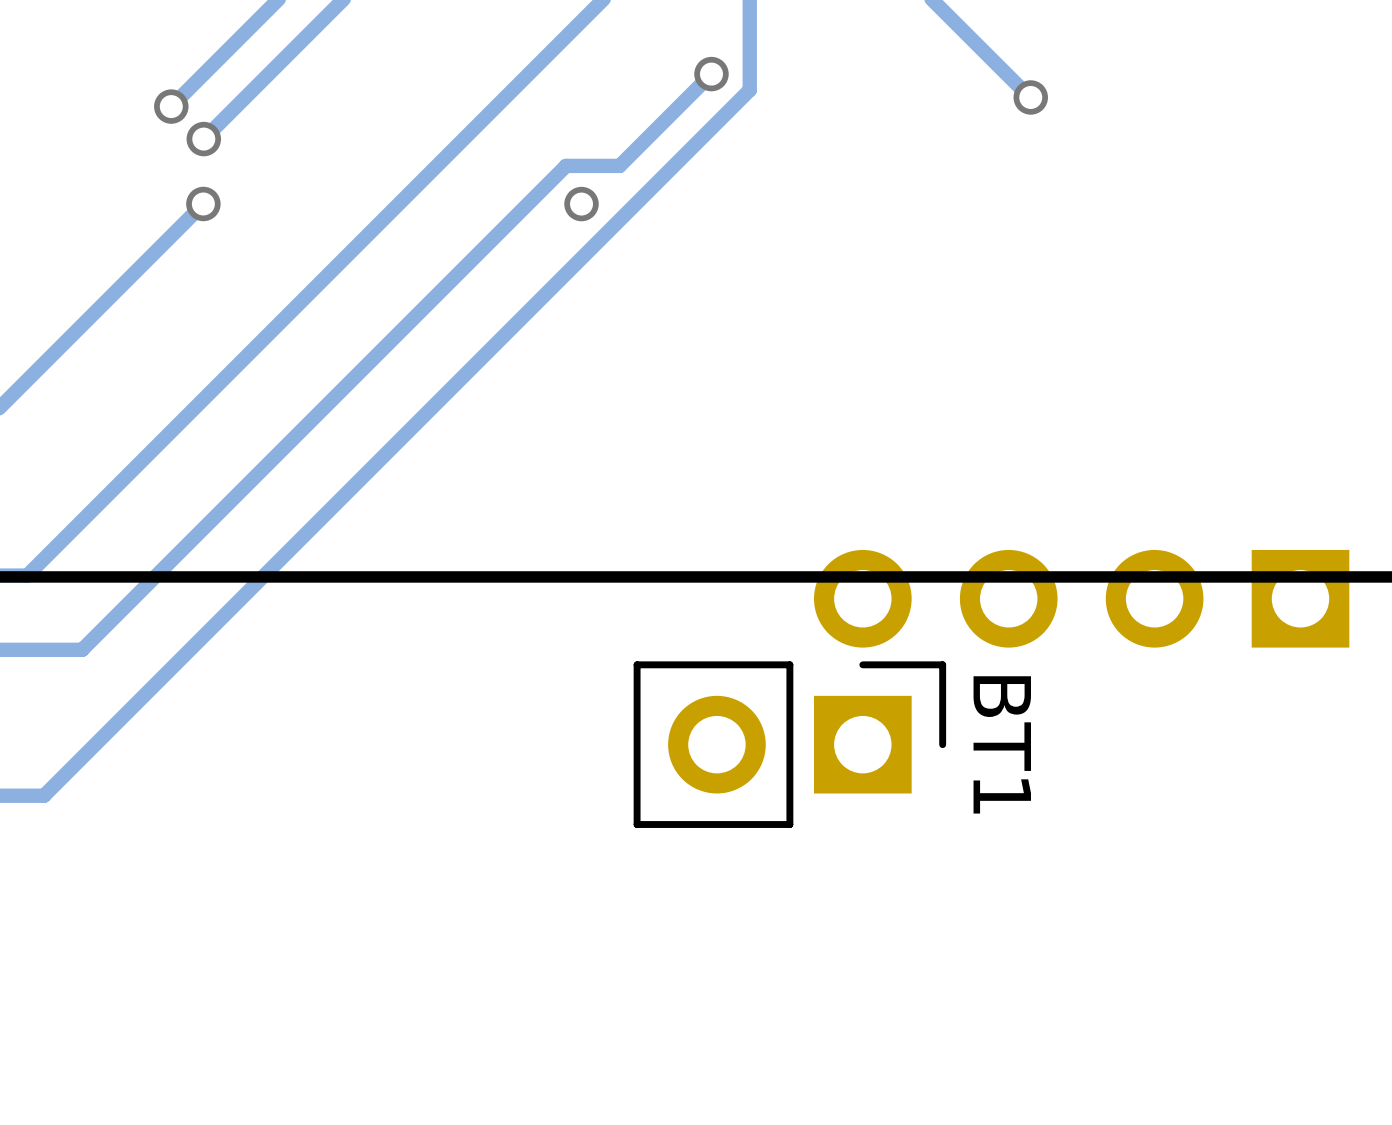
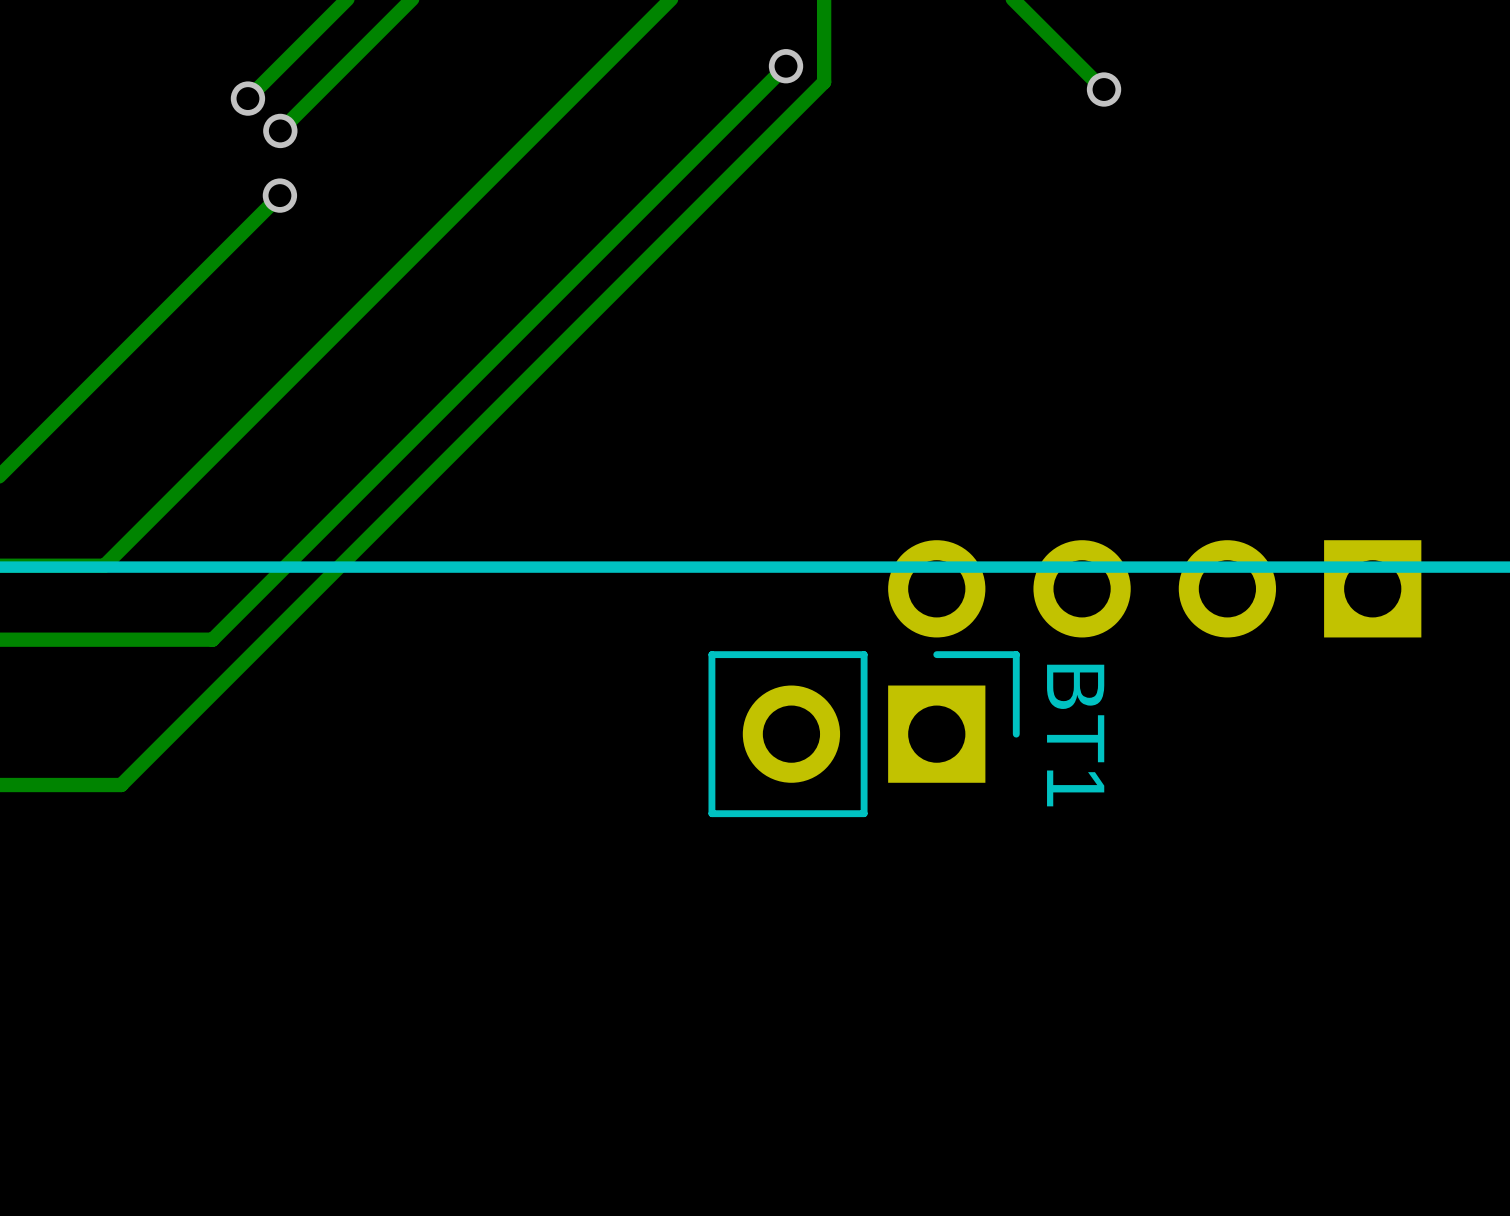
track: (619, 165) (566, 165) (82, 649) -> (694, 157) (212, 639) (159, 639)
via: (581, 204) -> none

